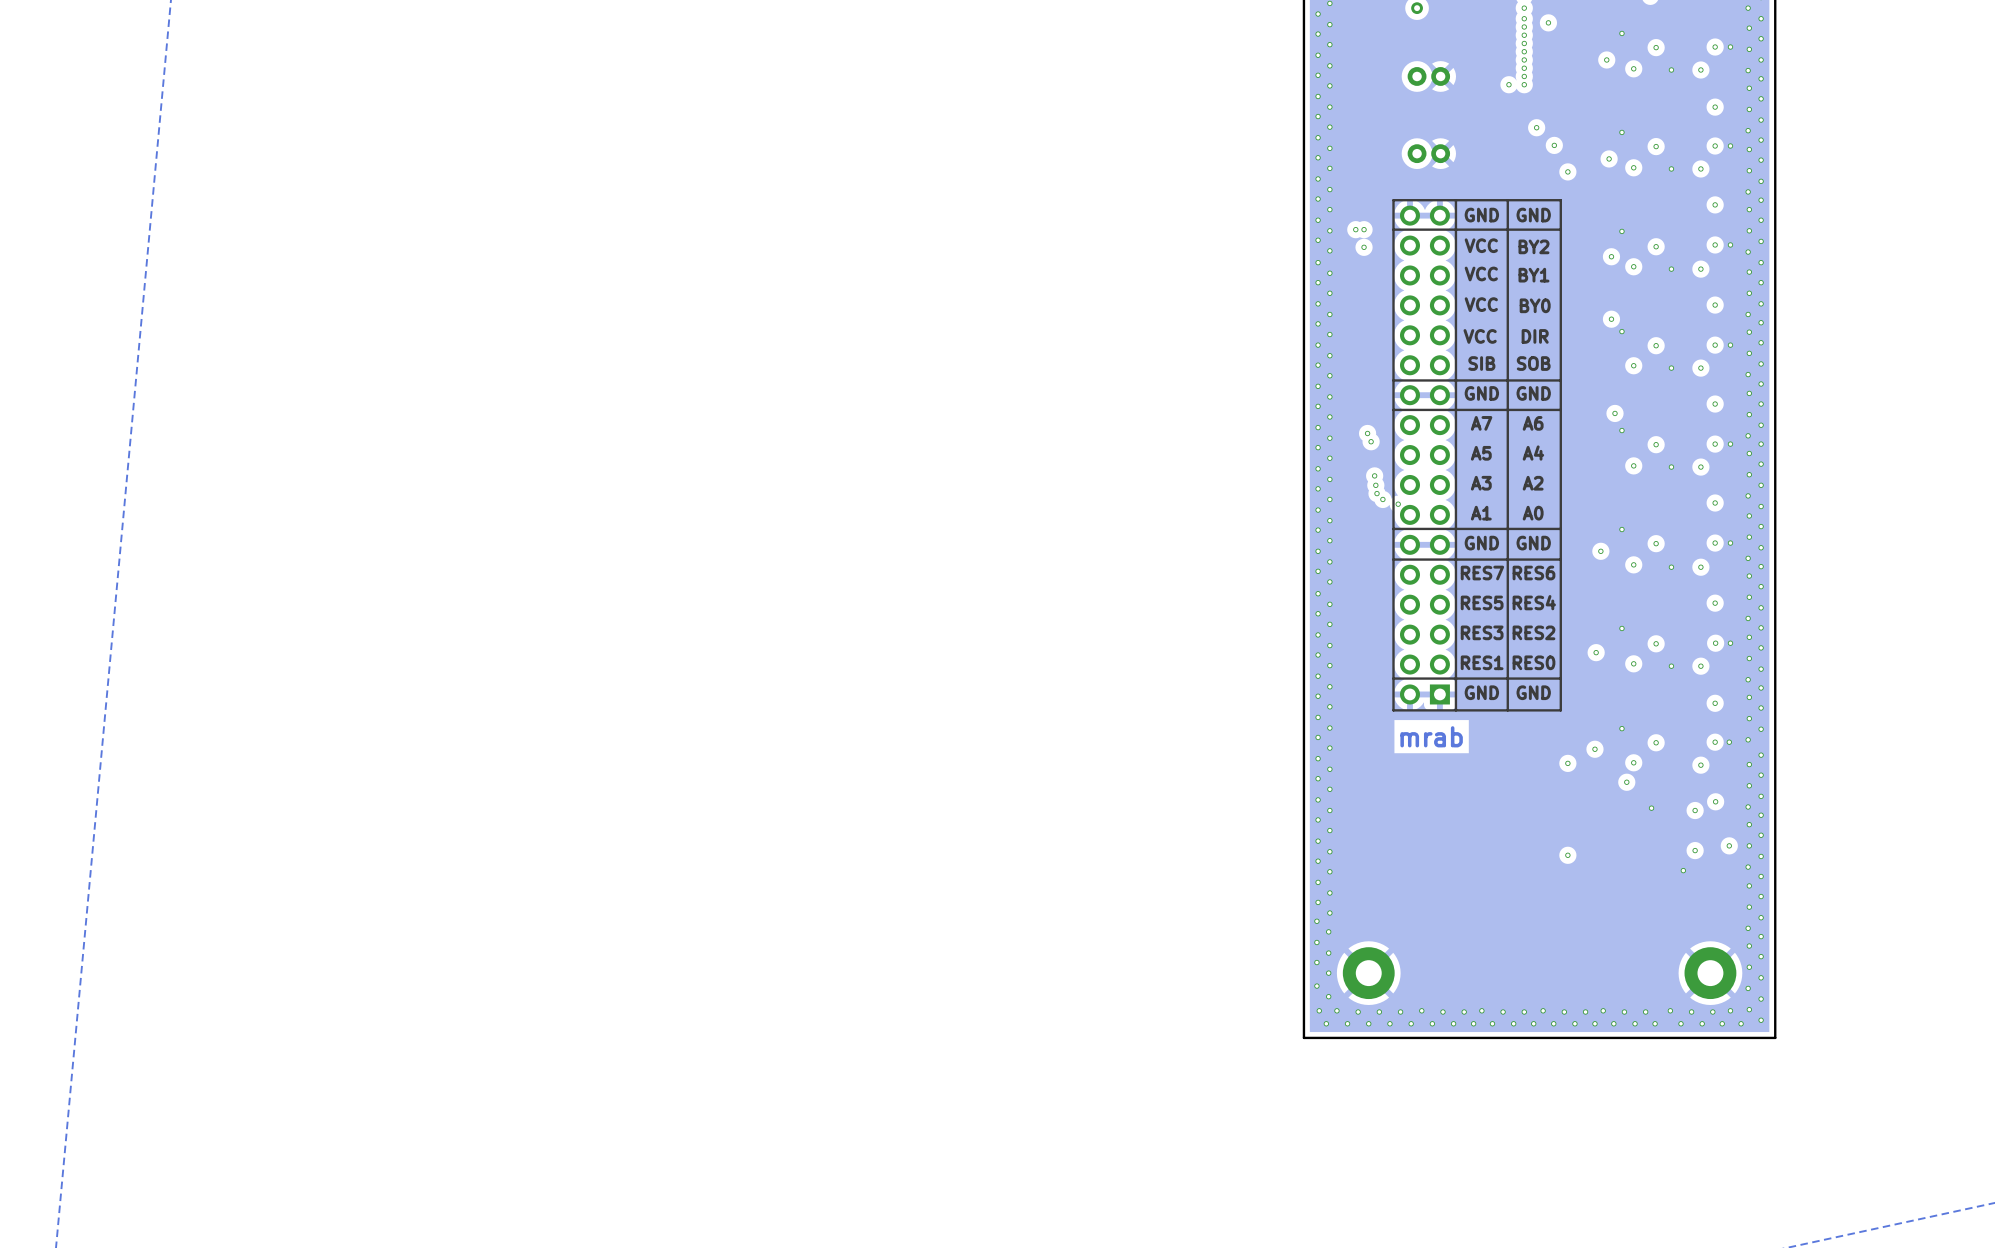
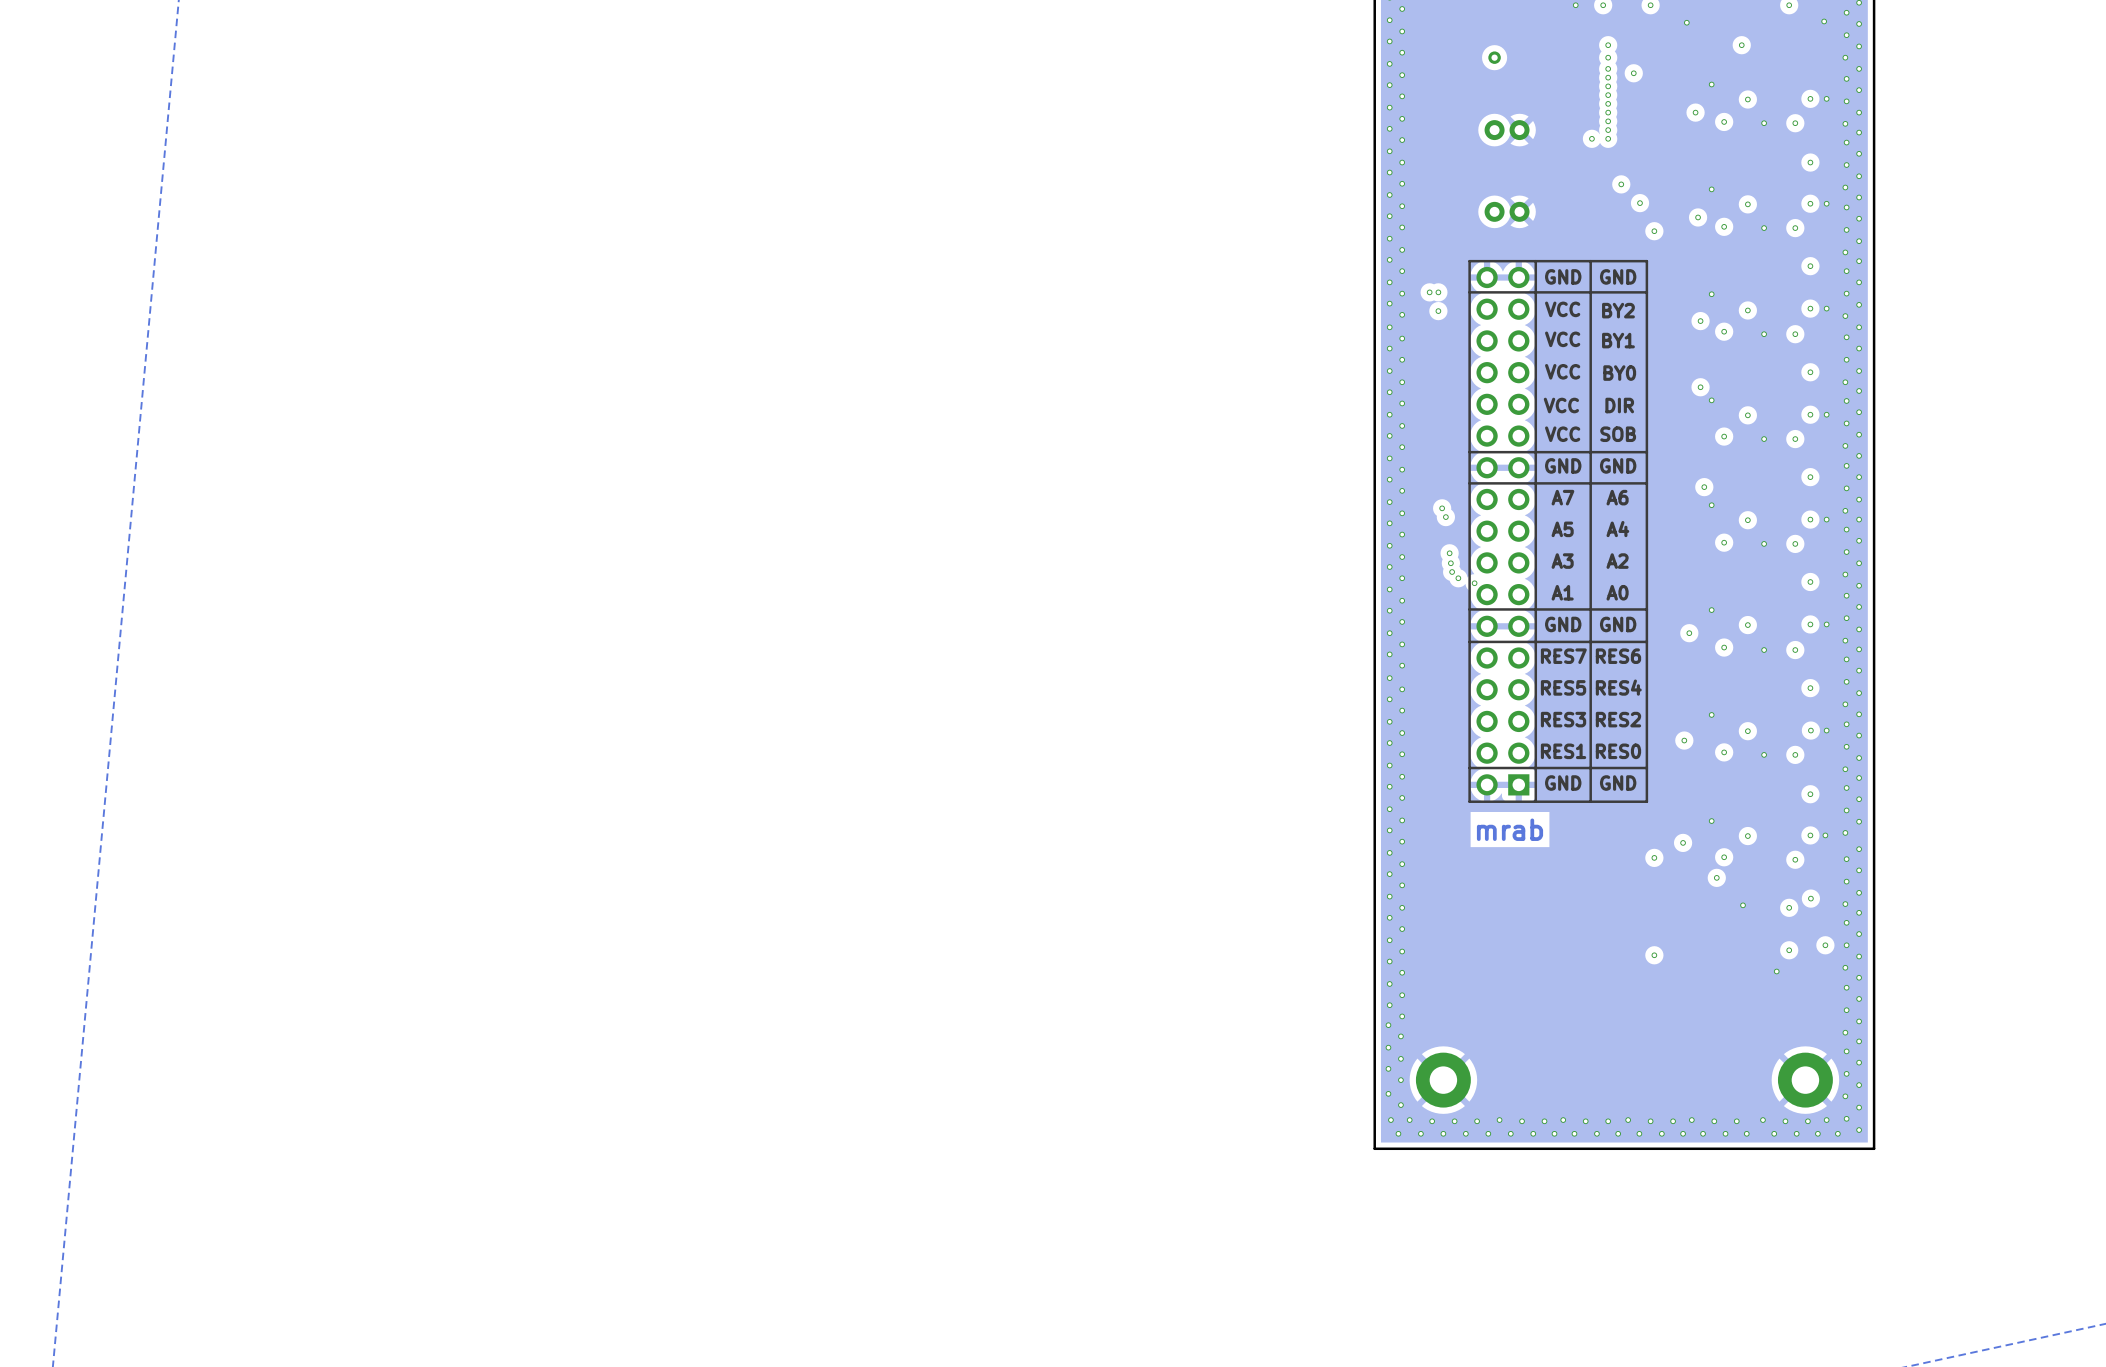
text: SIB (1481, 363) -> VCC (1562, 434)

